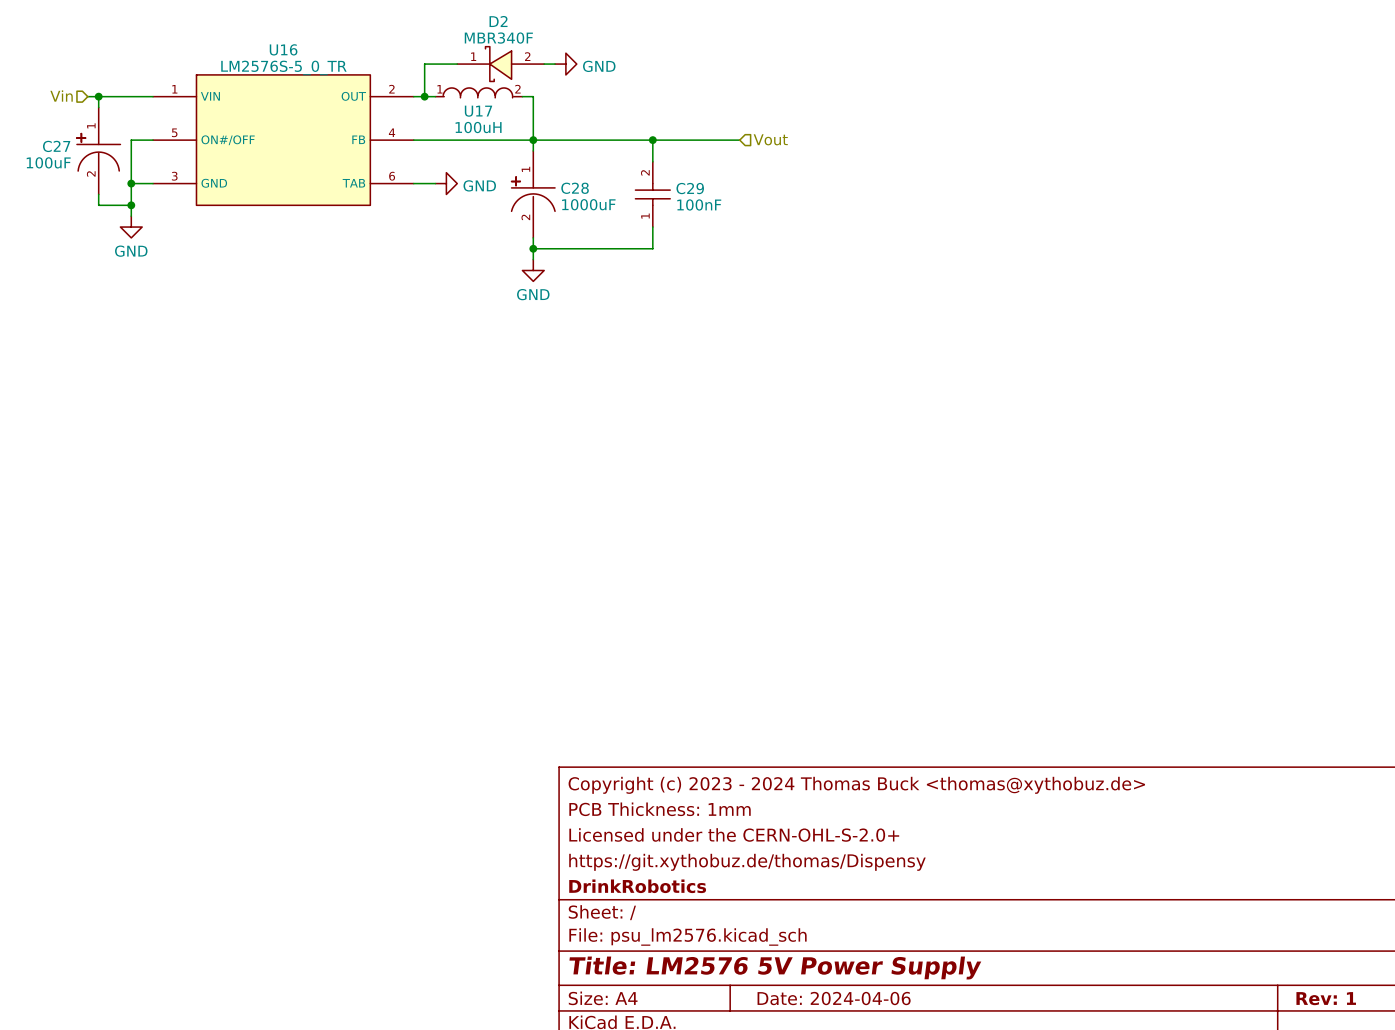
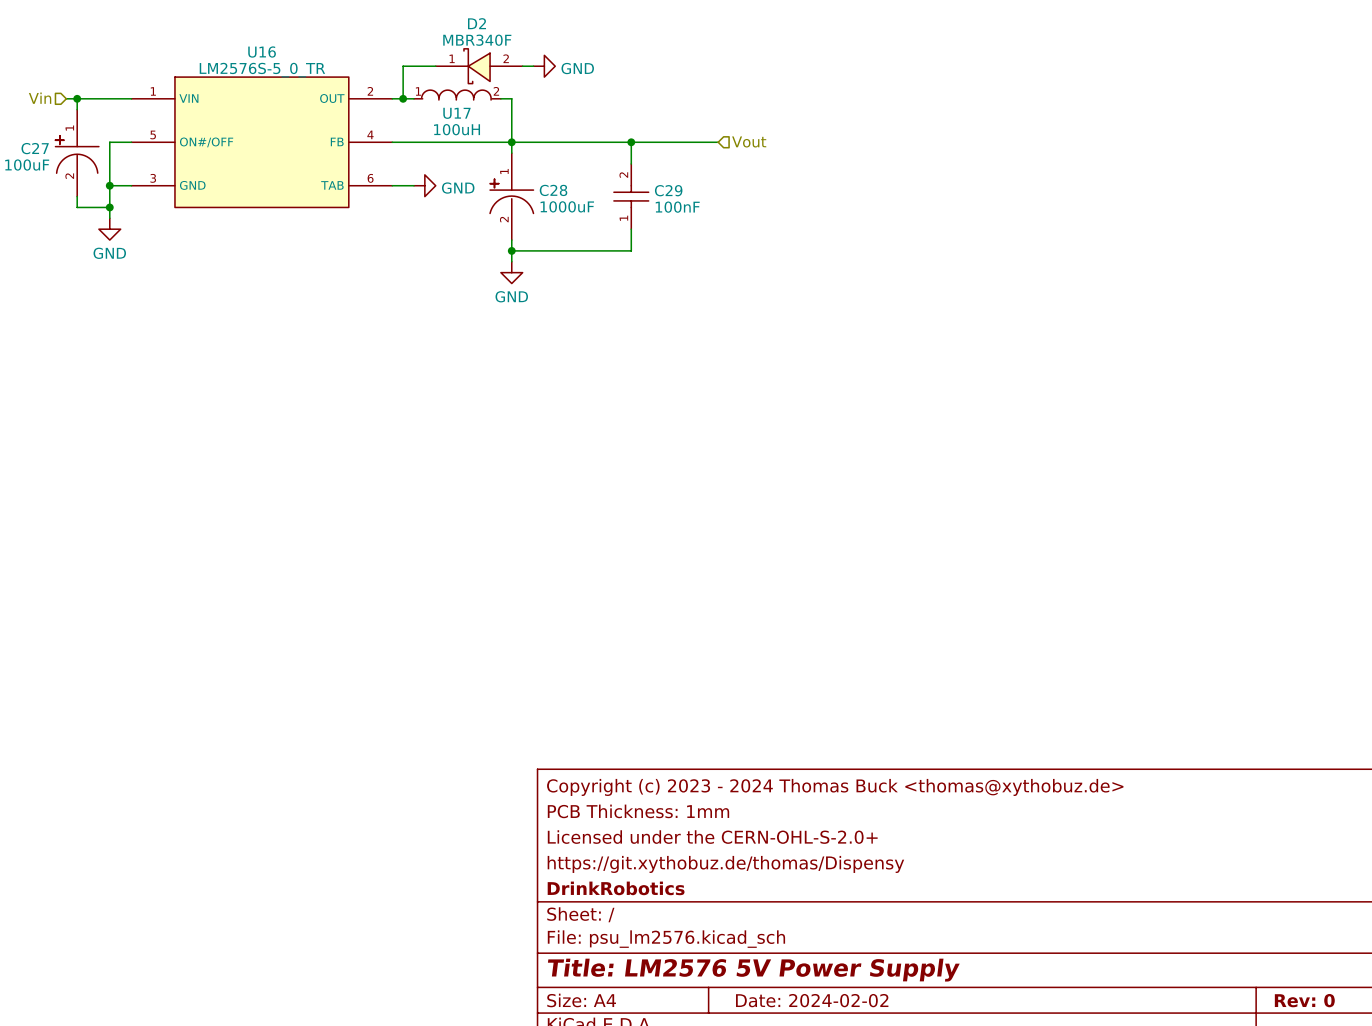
title block: Date: 2024-04-06 (834, 998) -> Date: 2024-02-02 (812, 1000)
title block: Rev: 1 (1326, 998) -> Rev: 0 (1304, 1000)

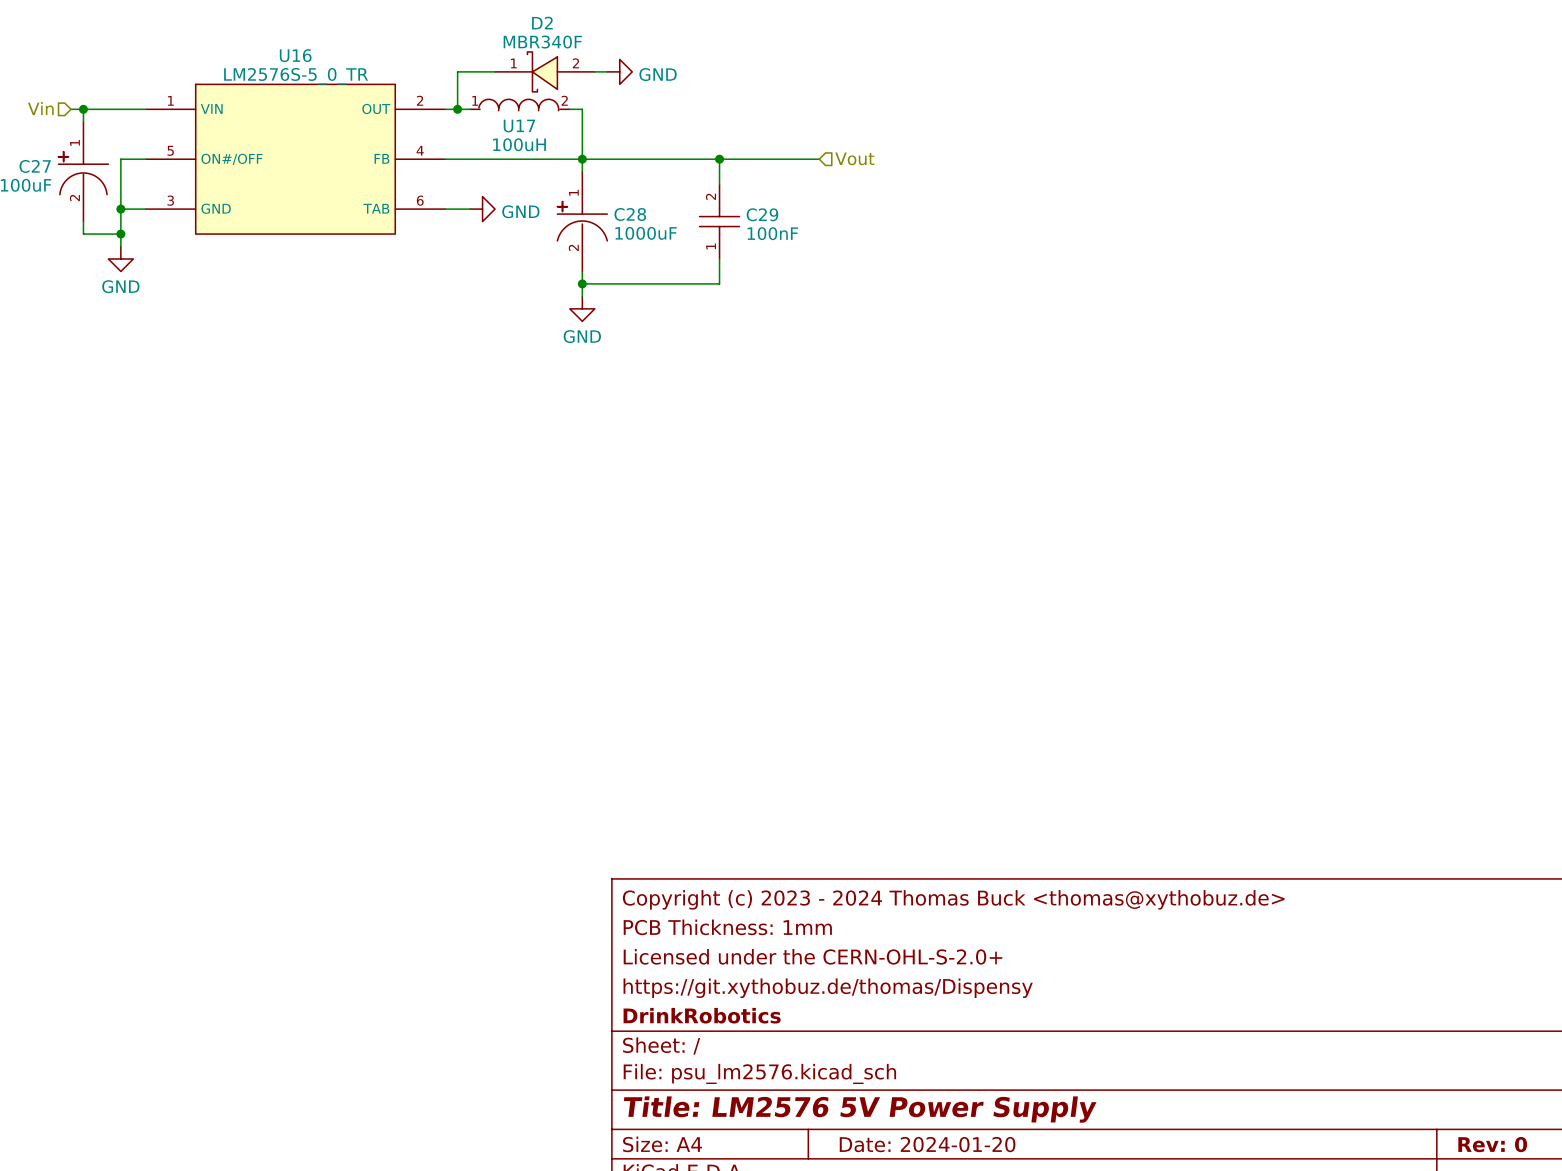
title block: Date: 2024-02-02 (812, 1000) -> Date: 2024-01-20 (927, 1144)

